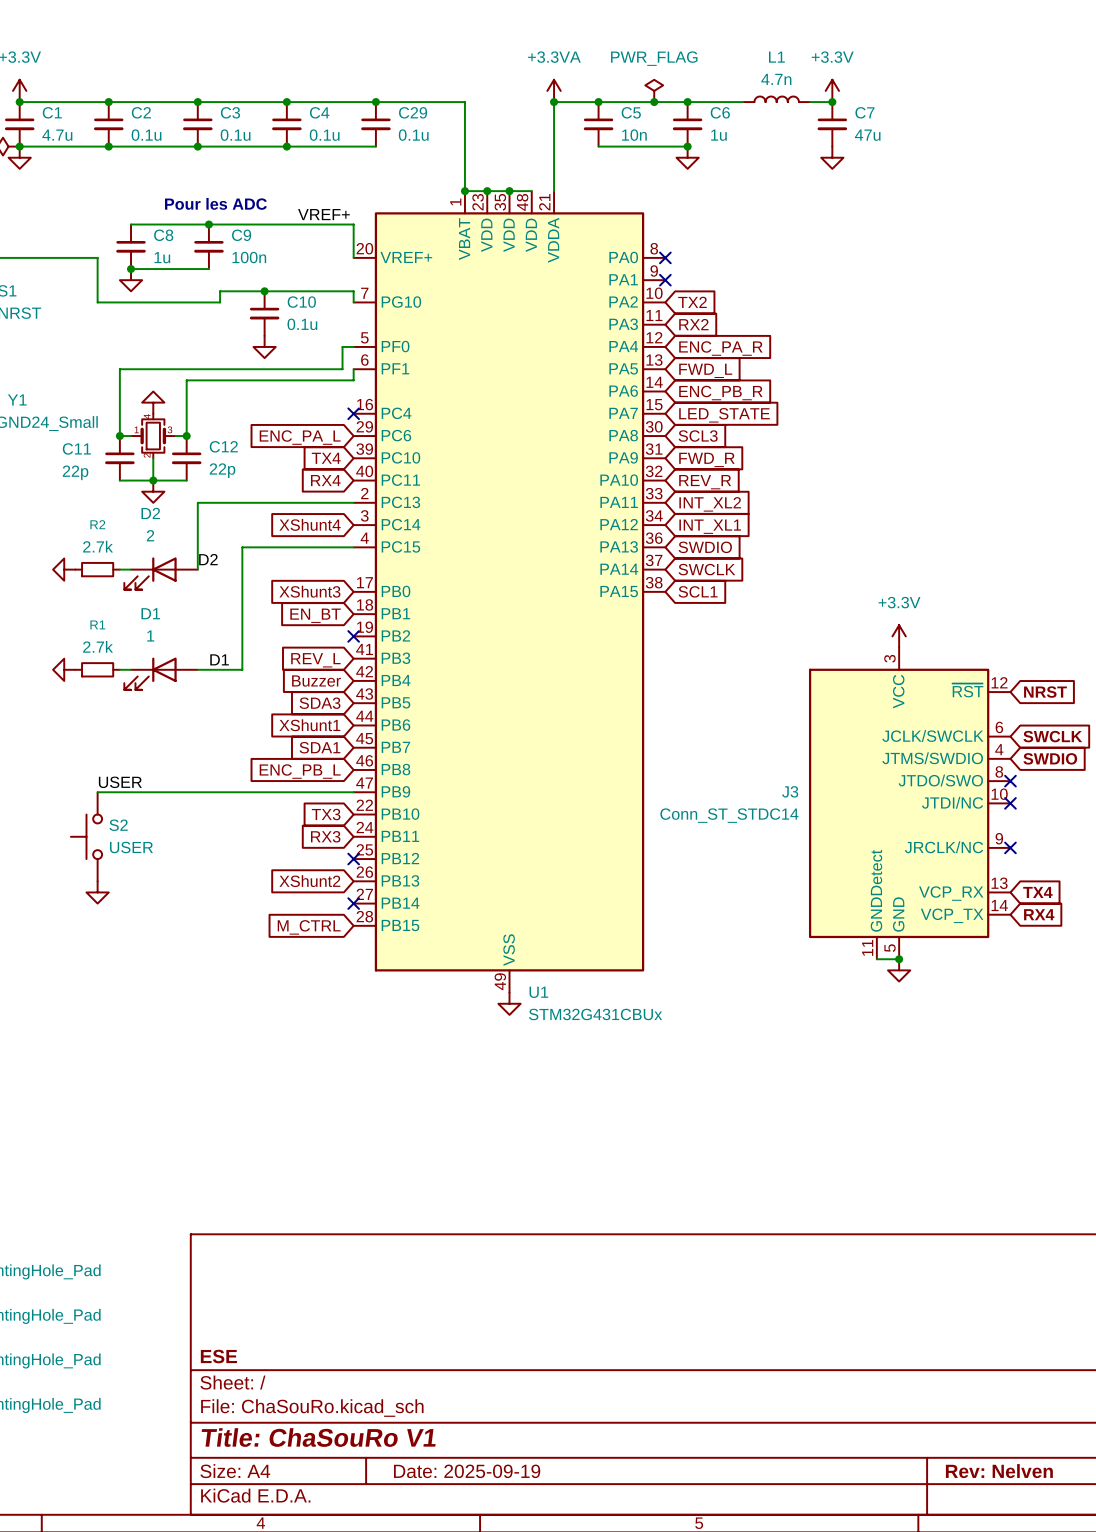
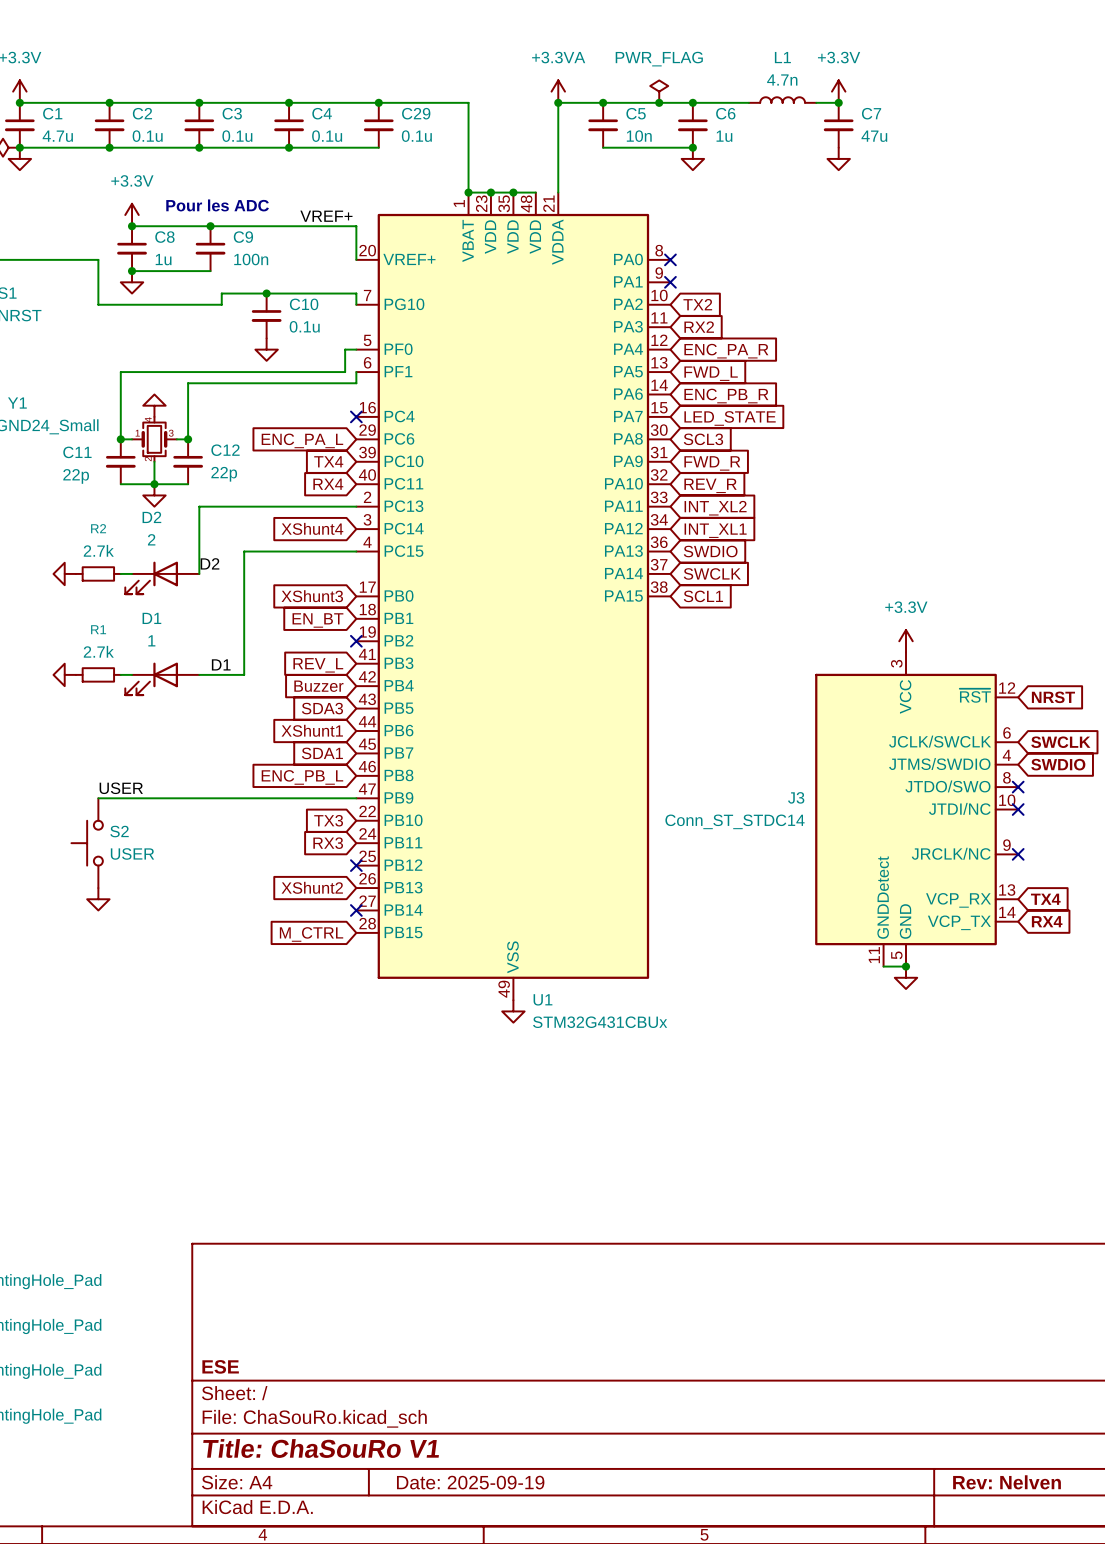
power symbol: none -> +3.3V (132, 215)
junction: none -> (132, 226)

